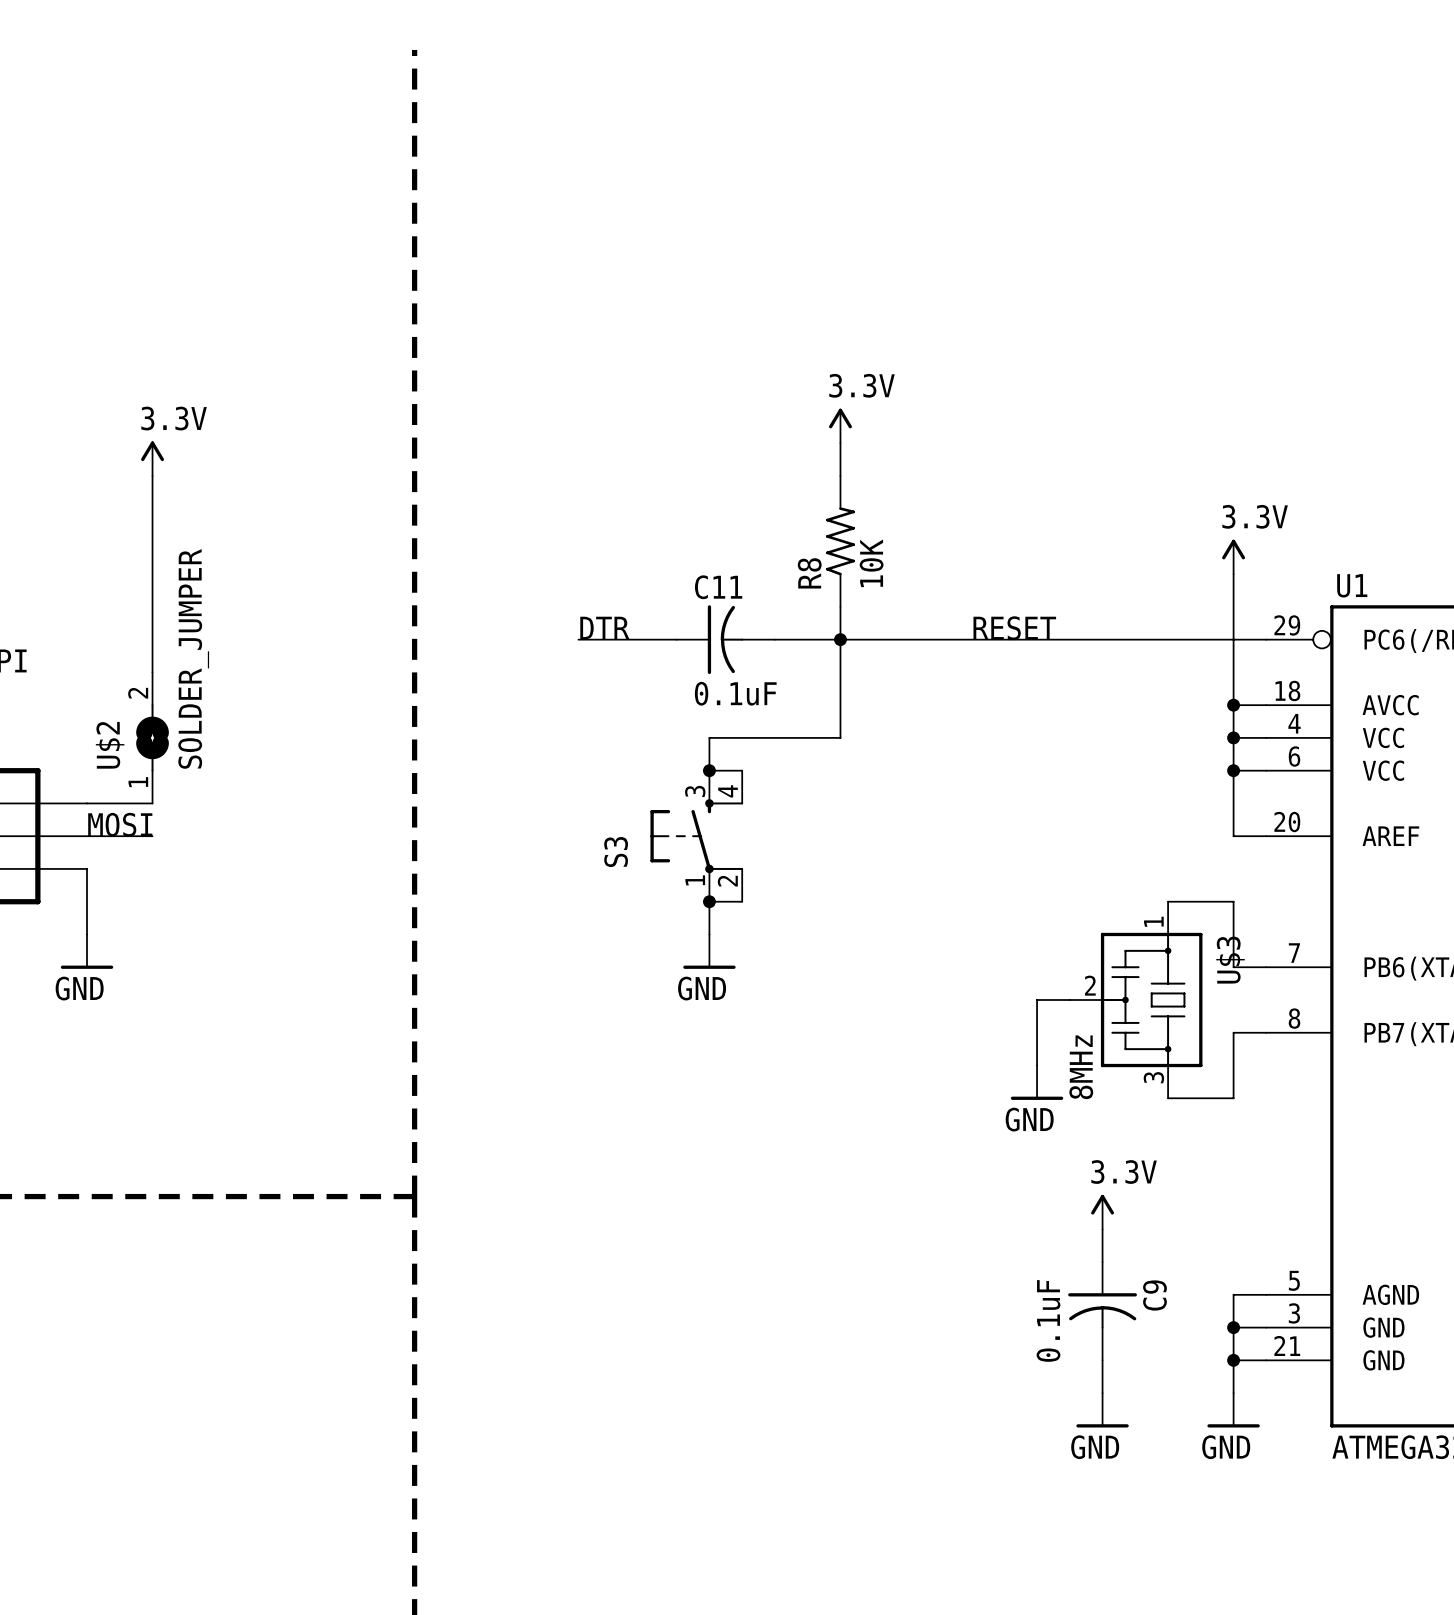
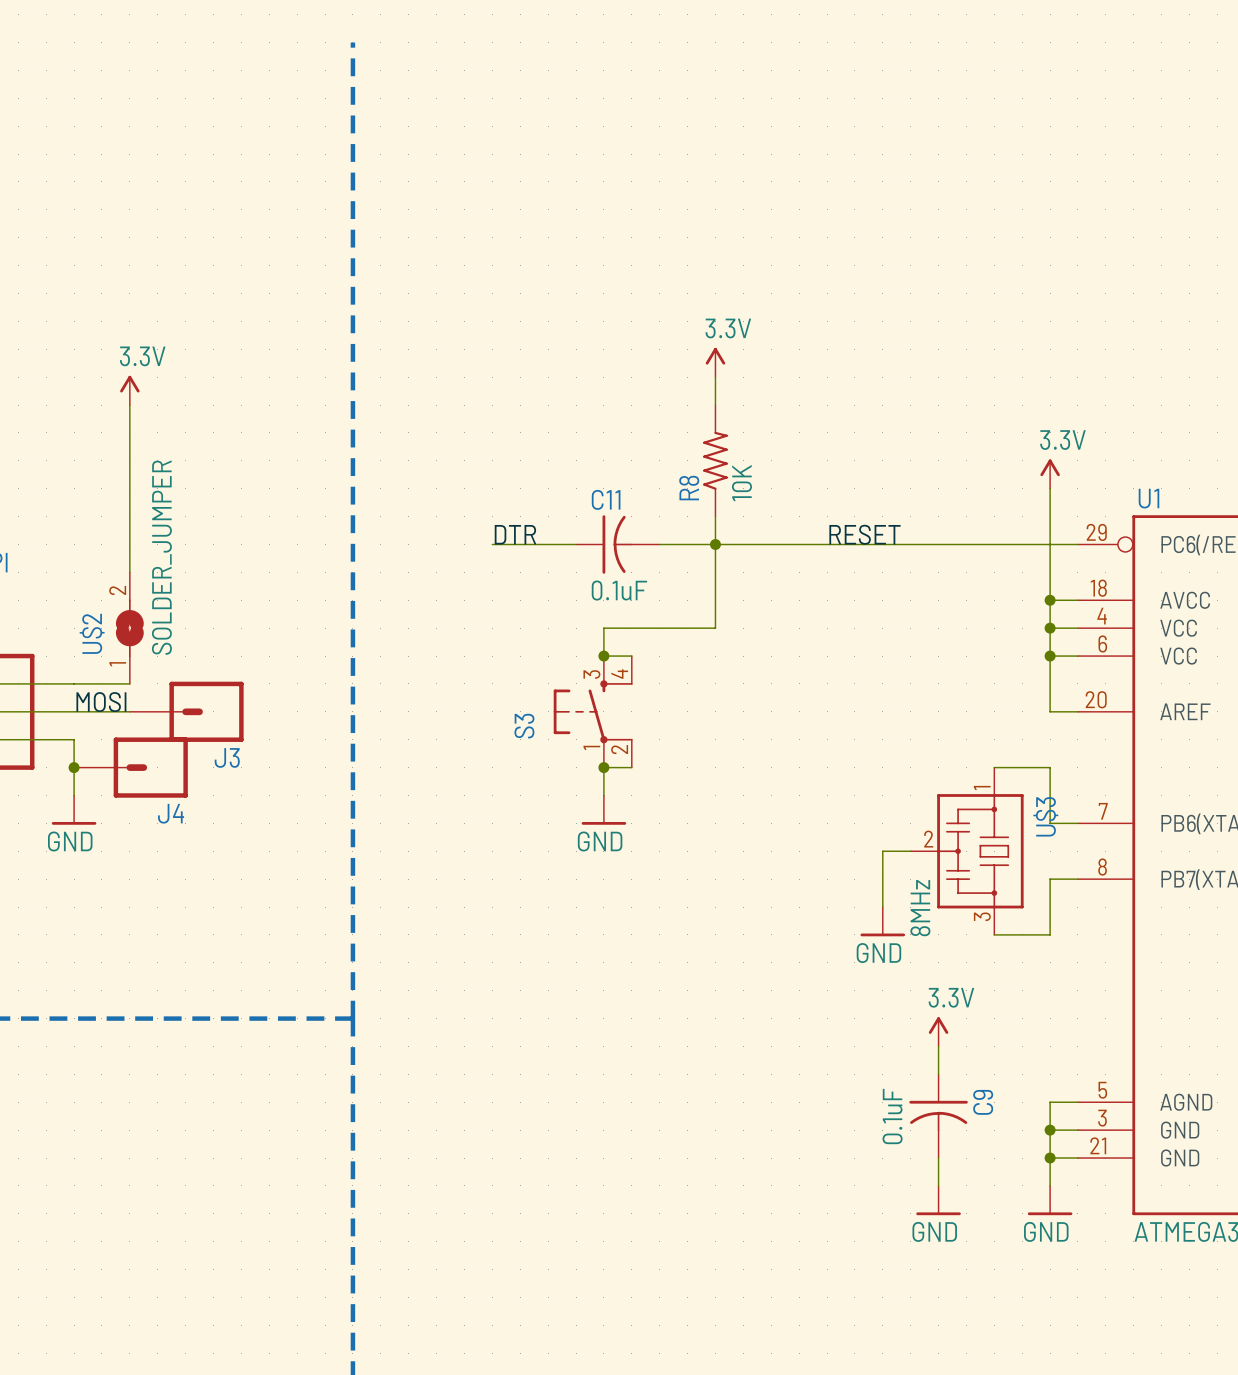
J3: none -> (186, 711)
junction: none -> (74, 767)
J4: none -> (130, 767)

